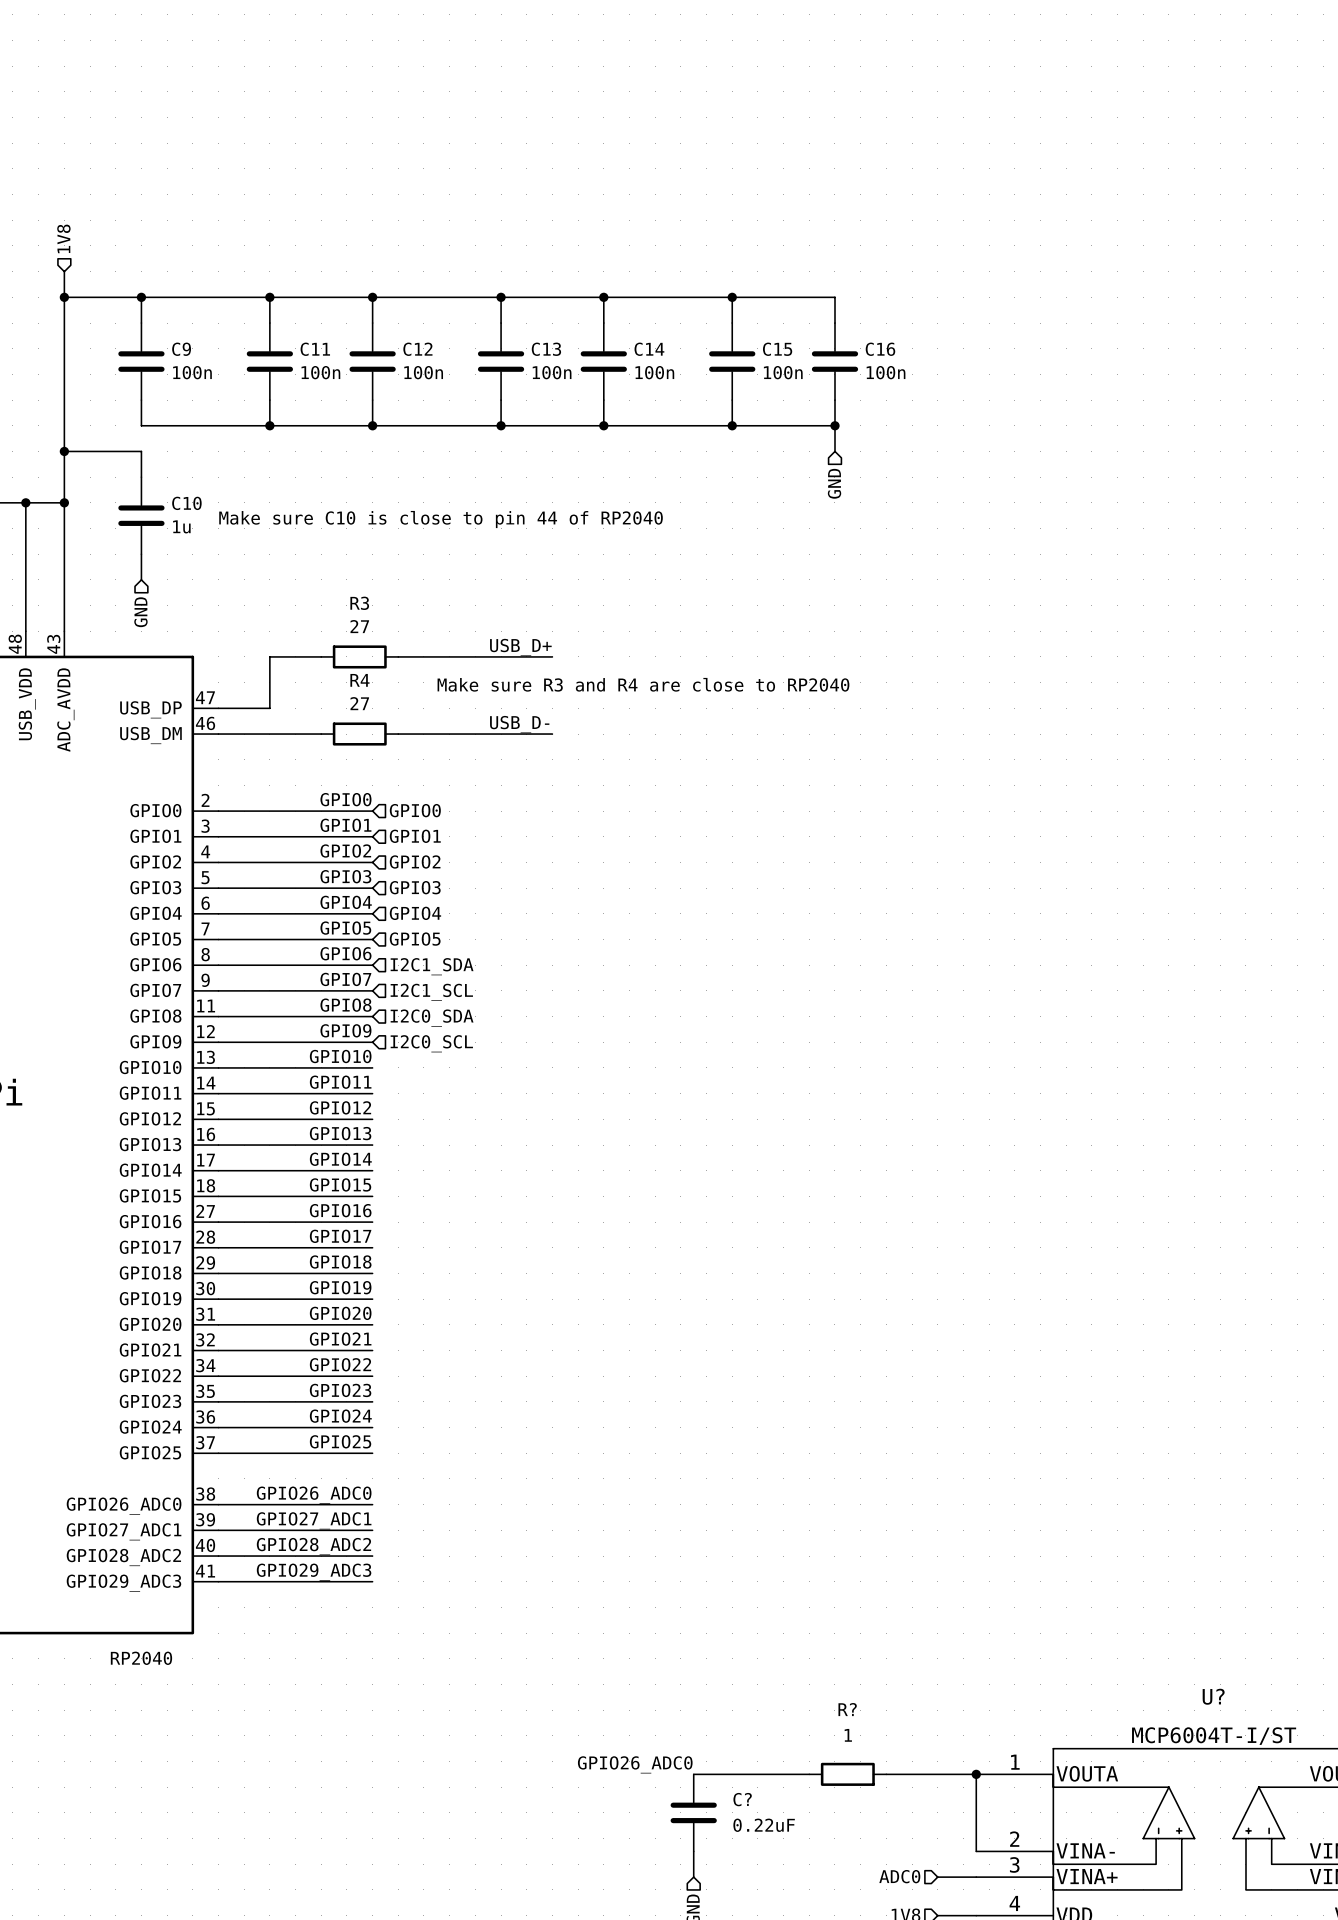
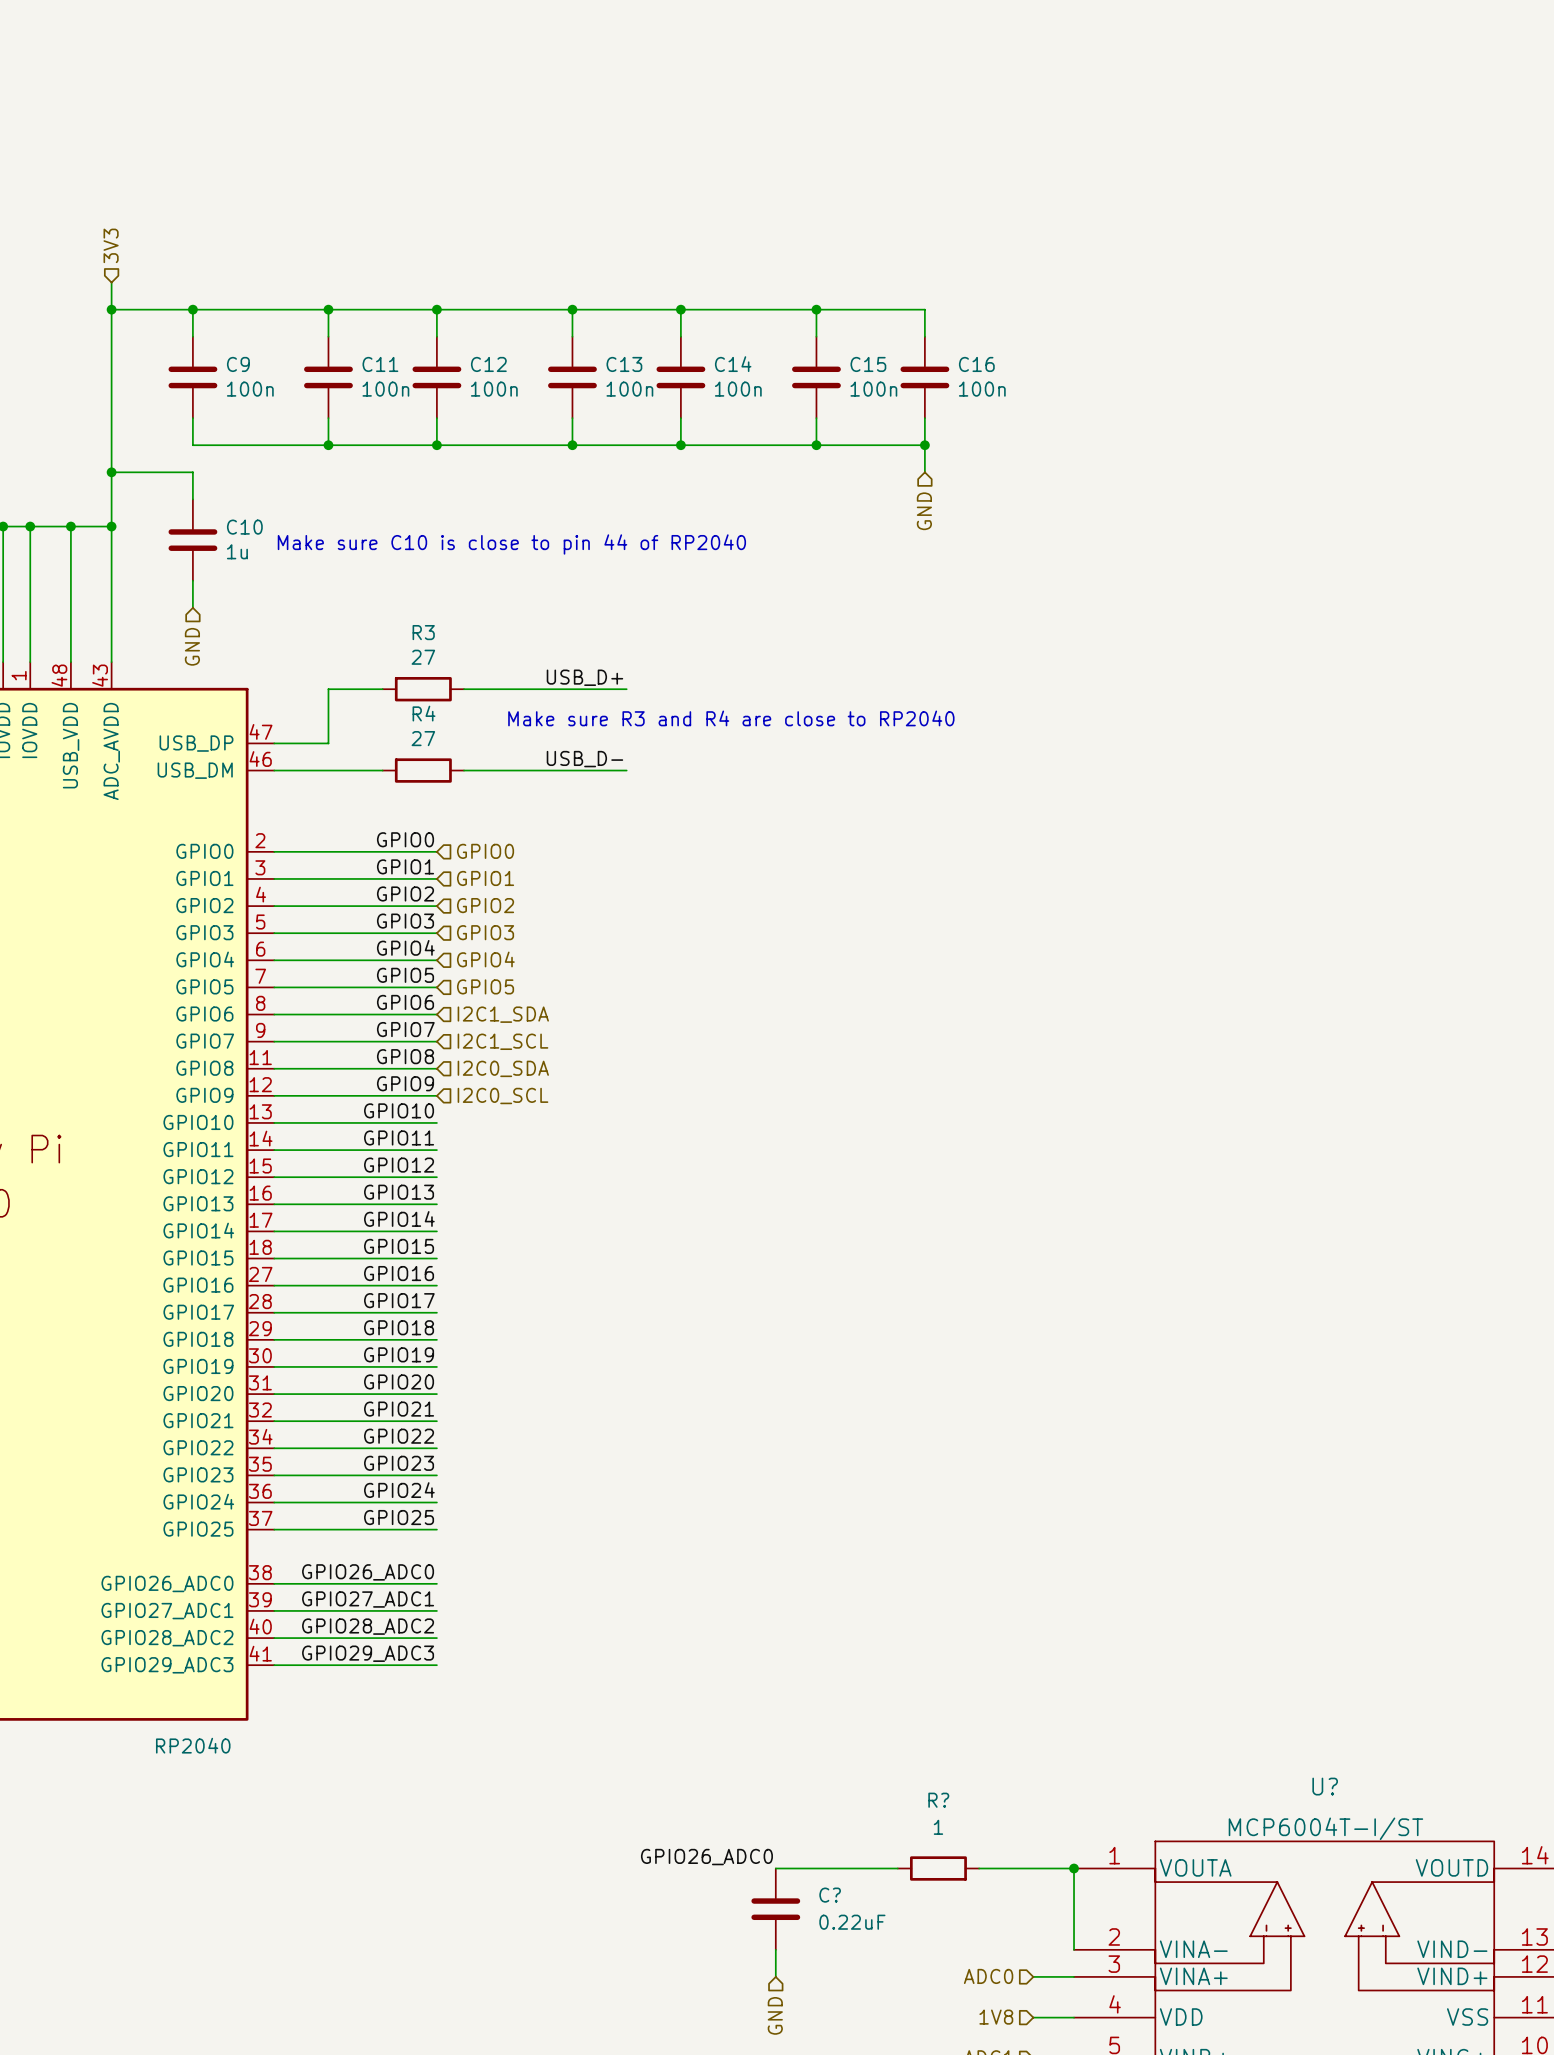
hierarchical label: 1V8 (63, 238) -> 3V3 (111, 245)

